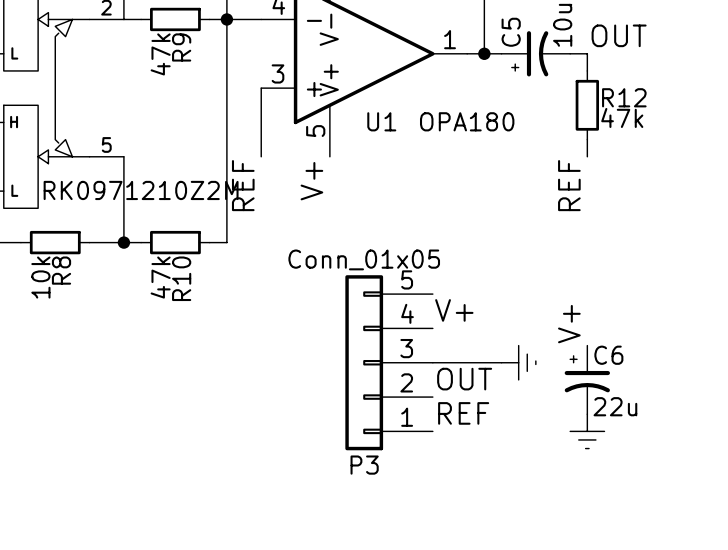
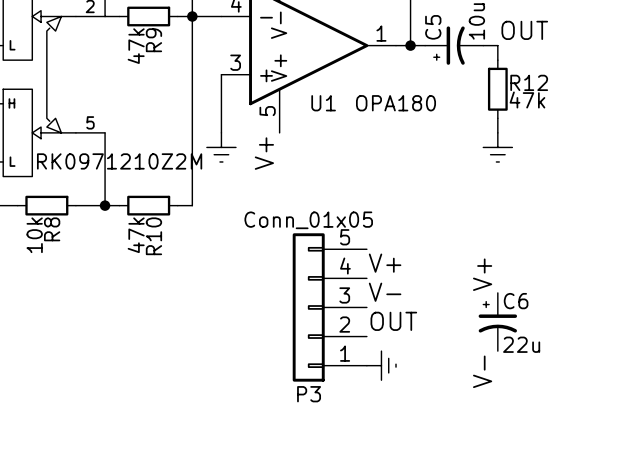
power symbol: none -> (221, 147)
power symbol: none -> (497, 147)
label: REF (243, 185) -> none
label: REF (569, 185) -> none
label: none -> V- (385, 292)
wire: (432, 362) (501, 362) -> none
power symbol: (518, 362) -> none
label: REF (463, 413) -> none
power symbol: none -> (381, 365)
power symbol: (587, 431) -> none
label: none -> V- (482, 371)

